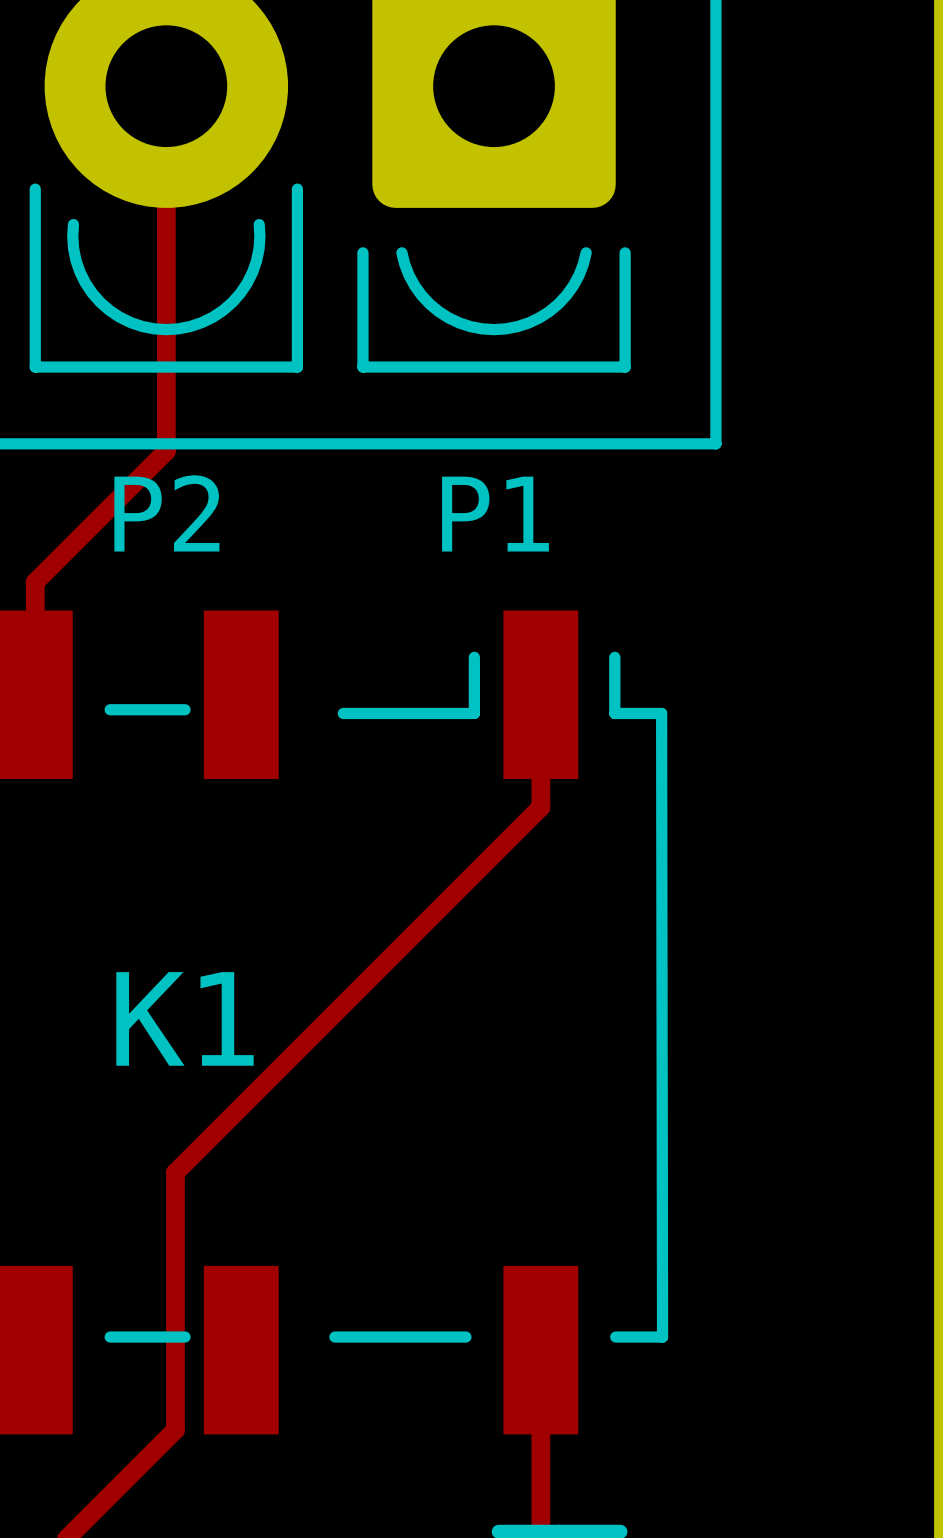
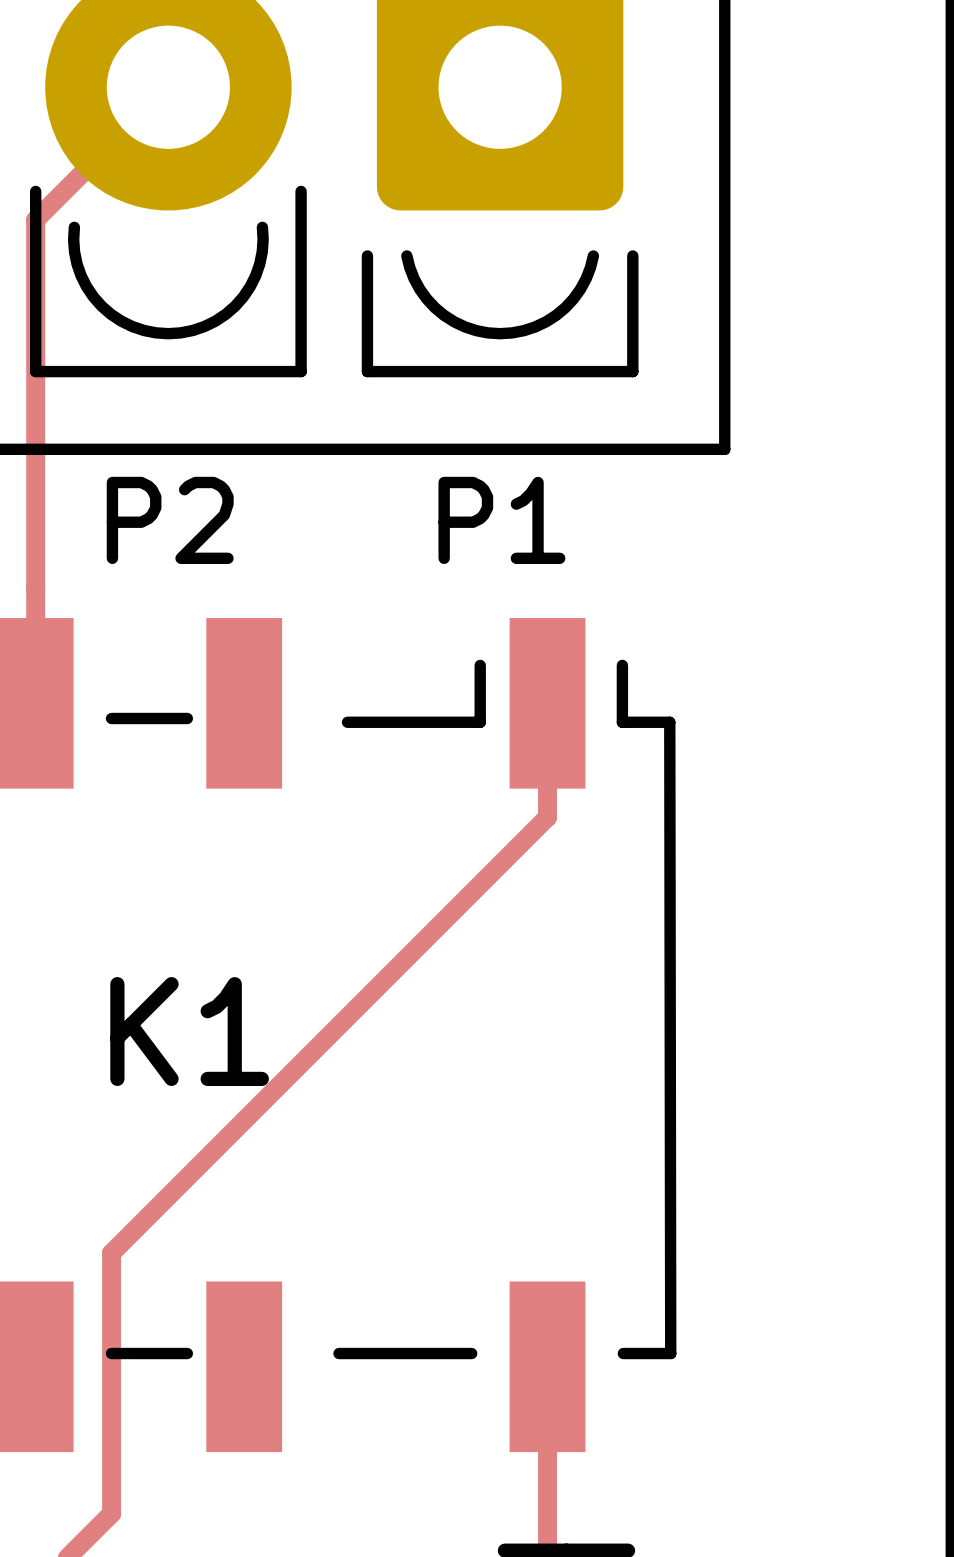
track: (166, 86) (166, 451) (35, 582) -> (168, 87) (35, 219) (35, 589)
track: (175, 1172) (175, 1429) (110, 1495) -> (177, 1187) (111, 1253) (111, 1513)

